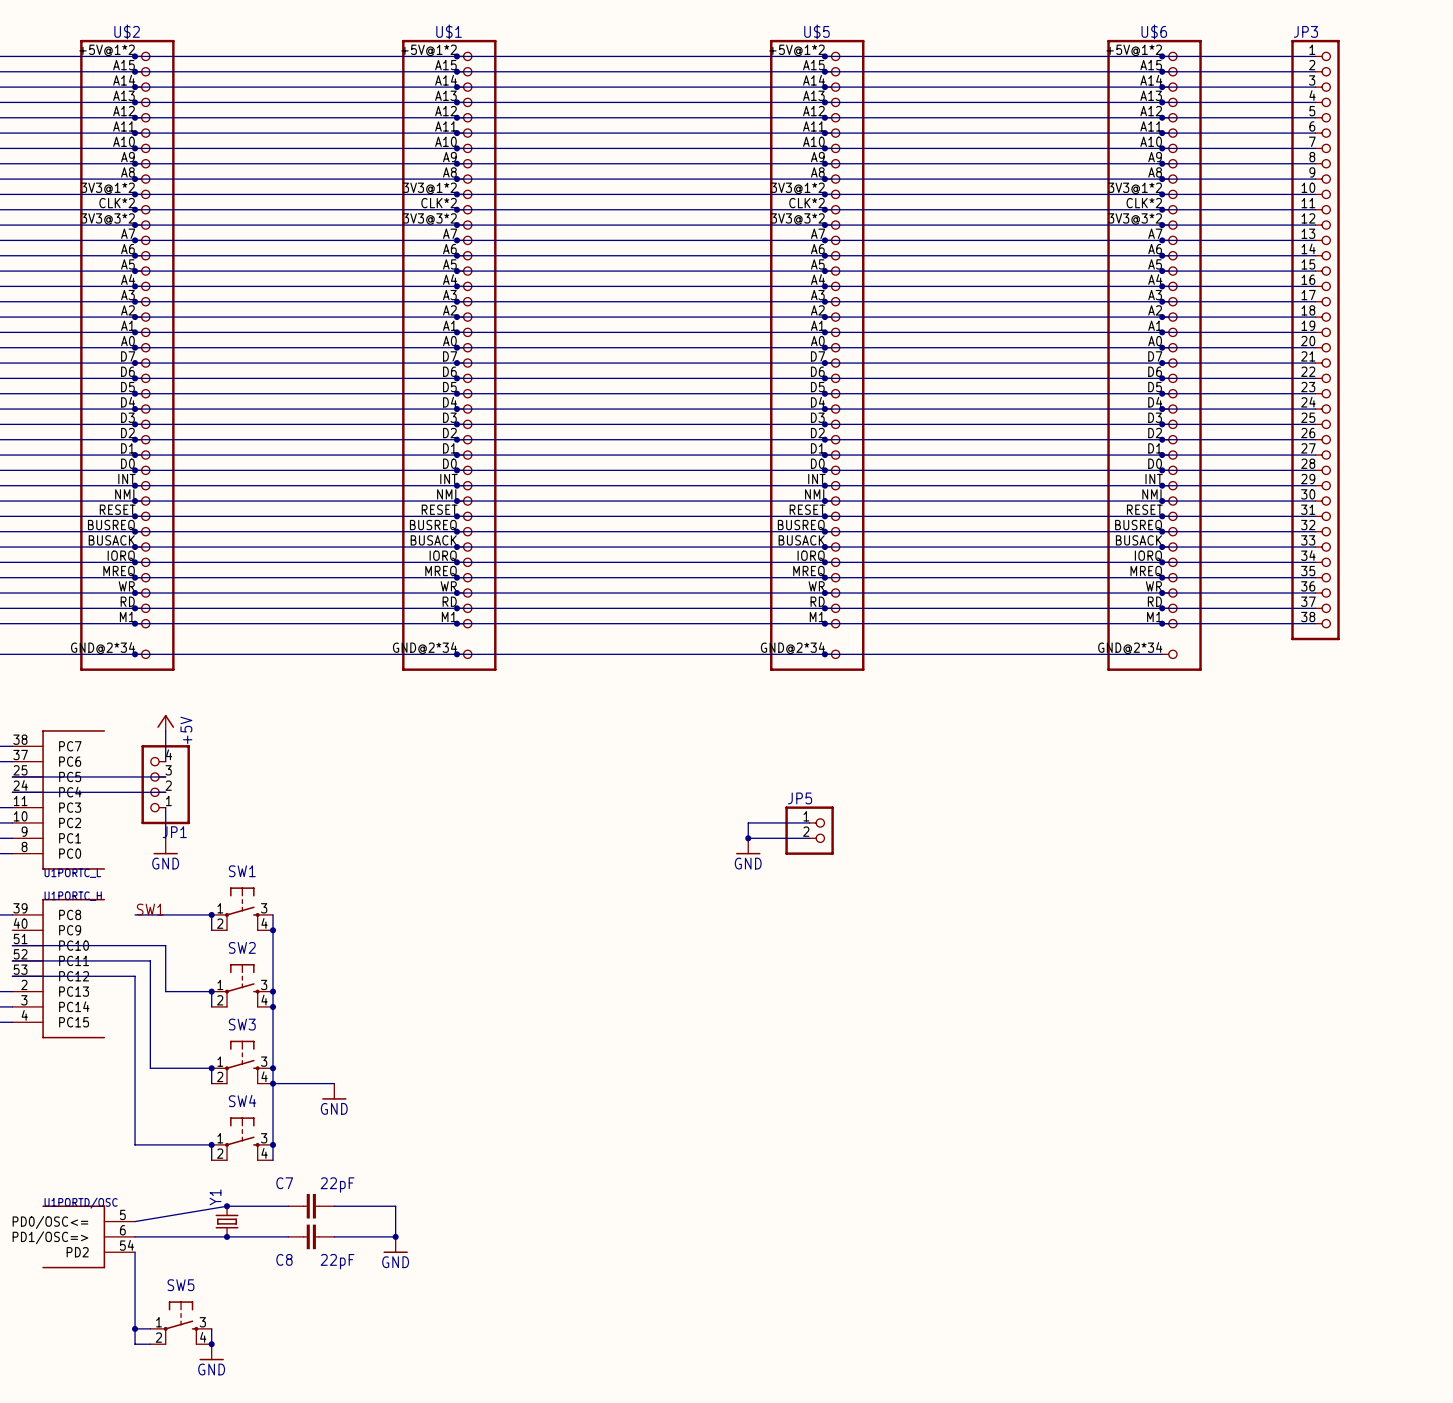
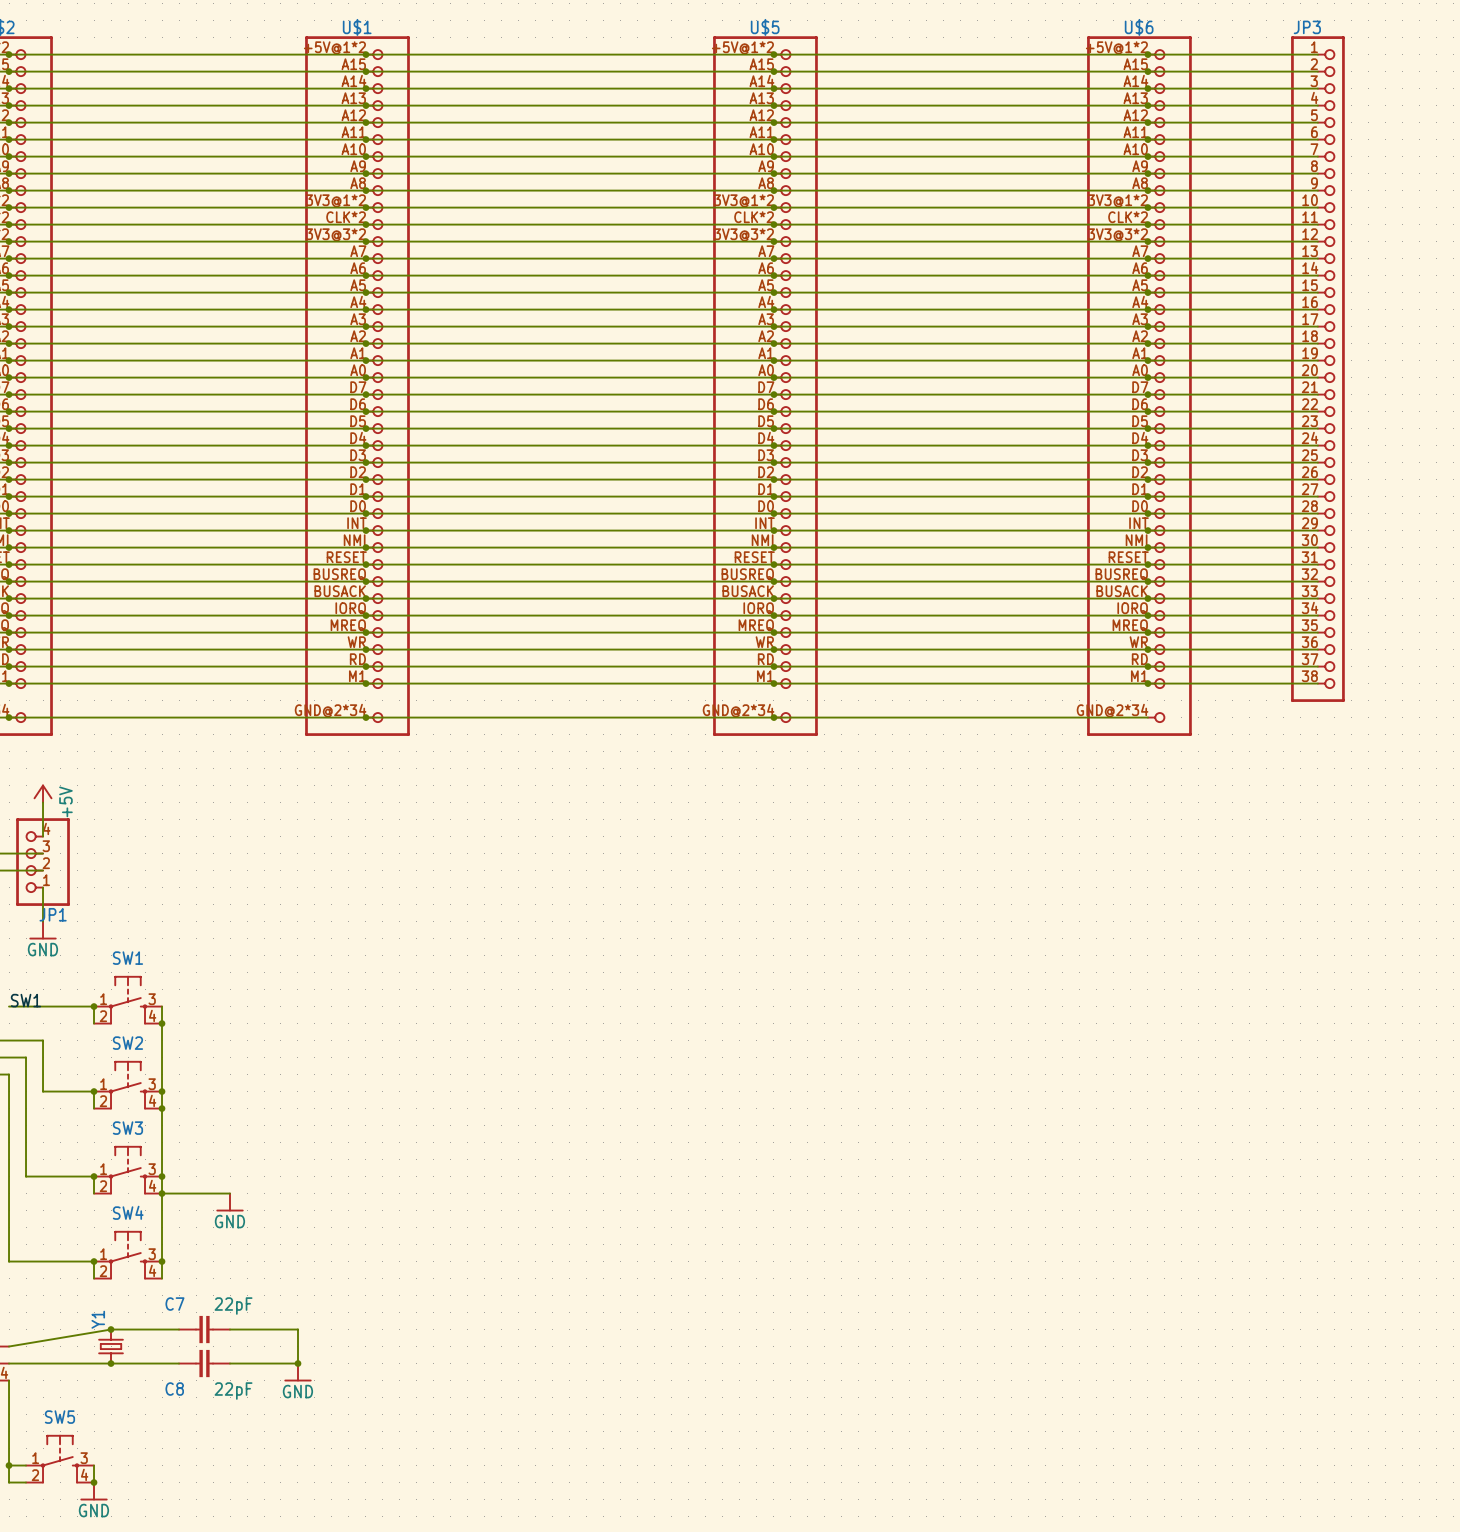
wire: (809, 822) (748, 822) (748, 838) (809, 838) -> none
JP5: (809, 830) -> none
junction: (748, 838) -> none
power symbol: GND (748, 846) -> none

